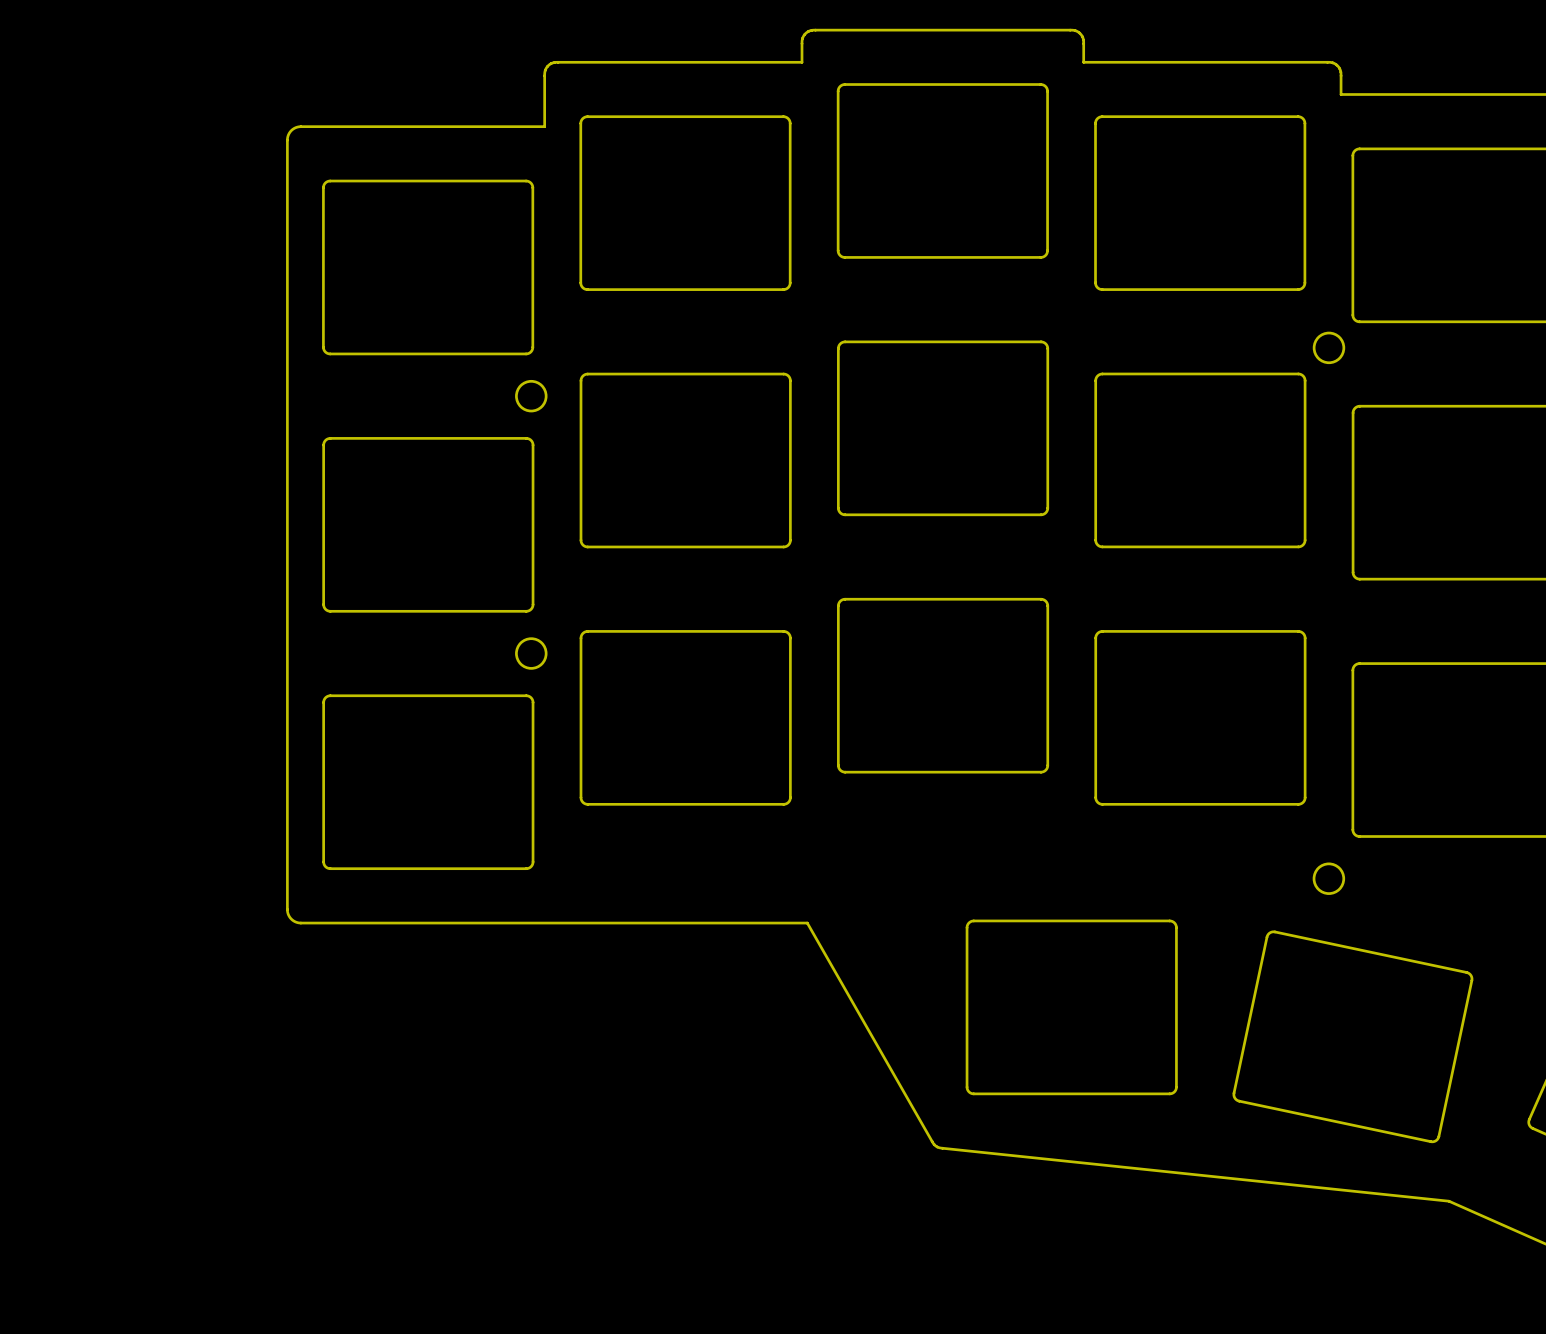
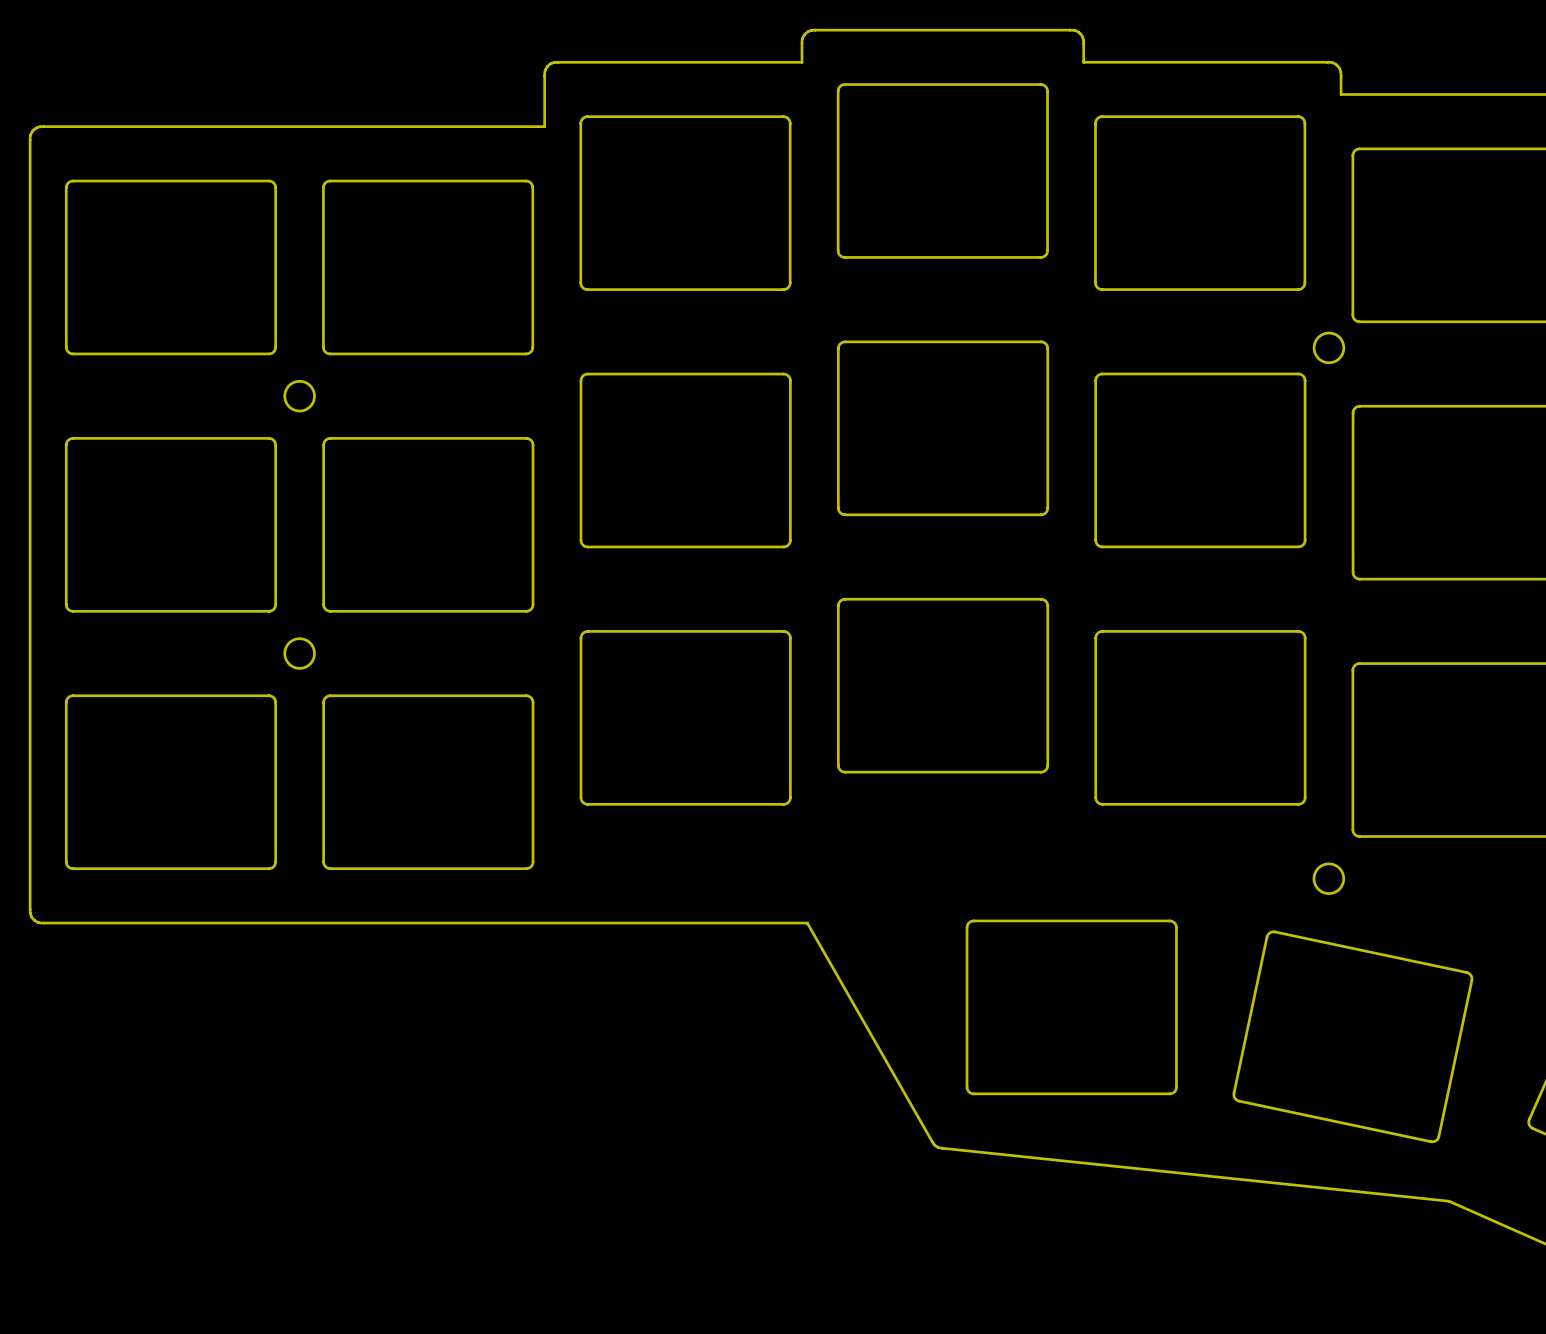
board edge: (300, 126) (291, 130) (287, 140) (287, 909) (291, 919) (300, 923) -> (300, 126) (41, 126) (32, 130) (30, 140) (30, 915) (35, 920) (42, 923) (300, 923)
board edge: none -> (73, 181) (273, 182) (275, 187) (274, 351) (268, 353) (68, 352) (66, 347) (66, 187) (68, 183) (73, 181)
round board edge: none -> [283, 379, 316, 413]
round board edge: [515, 379, 548, 413] -> none
board edge: none -> (73, 438) (273, 439) (275, 445) (274, 608) (268, 611) (68, 609) (66, 604) (66, 445) (68, 440) (73, 438)
round board edge: none -> [283, 637, 316, 670]
round board edge: [515, 637, 548, 670] -> none
board edge: none -> (73, 695) (273, 697) (275, 702) (274, 866) (268, 868) (68, 867) (66, 861) (66, 702) (68, 697) (73, 695)

